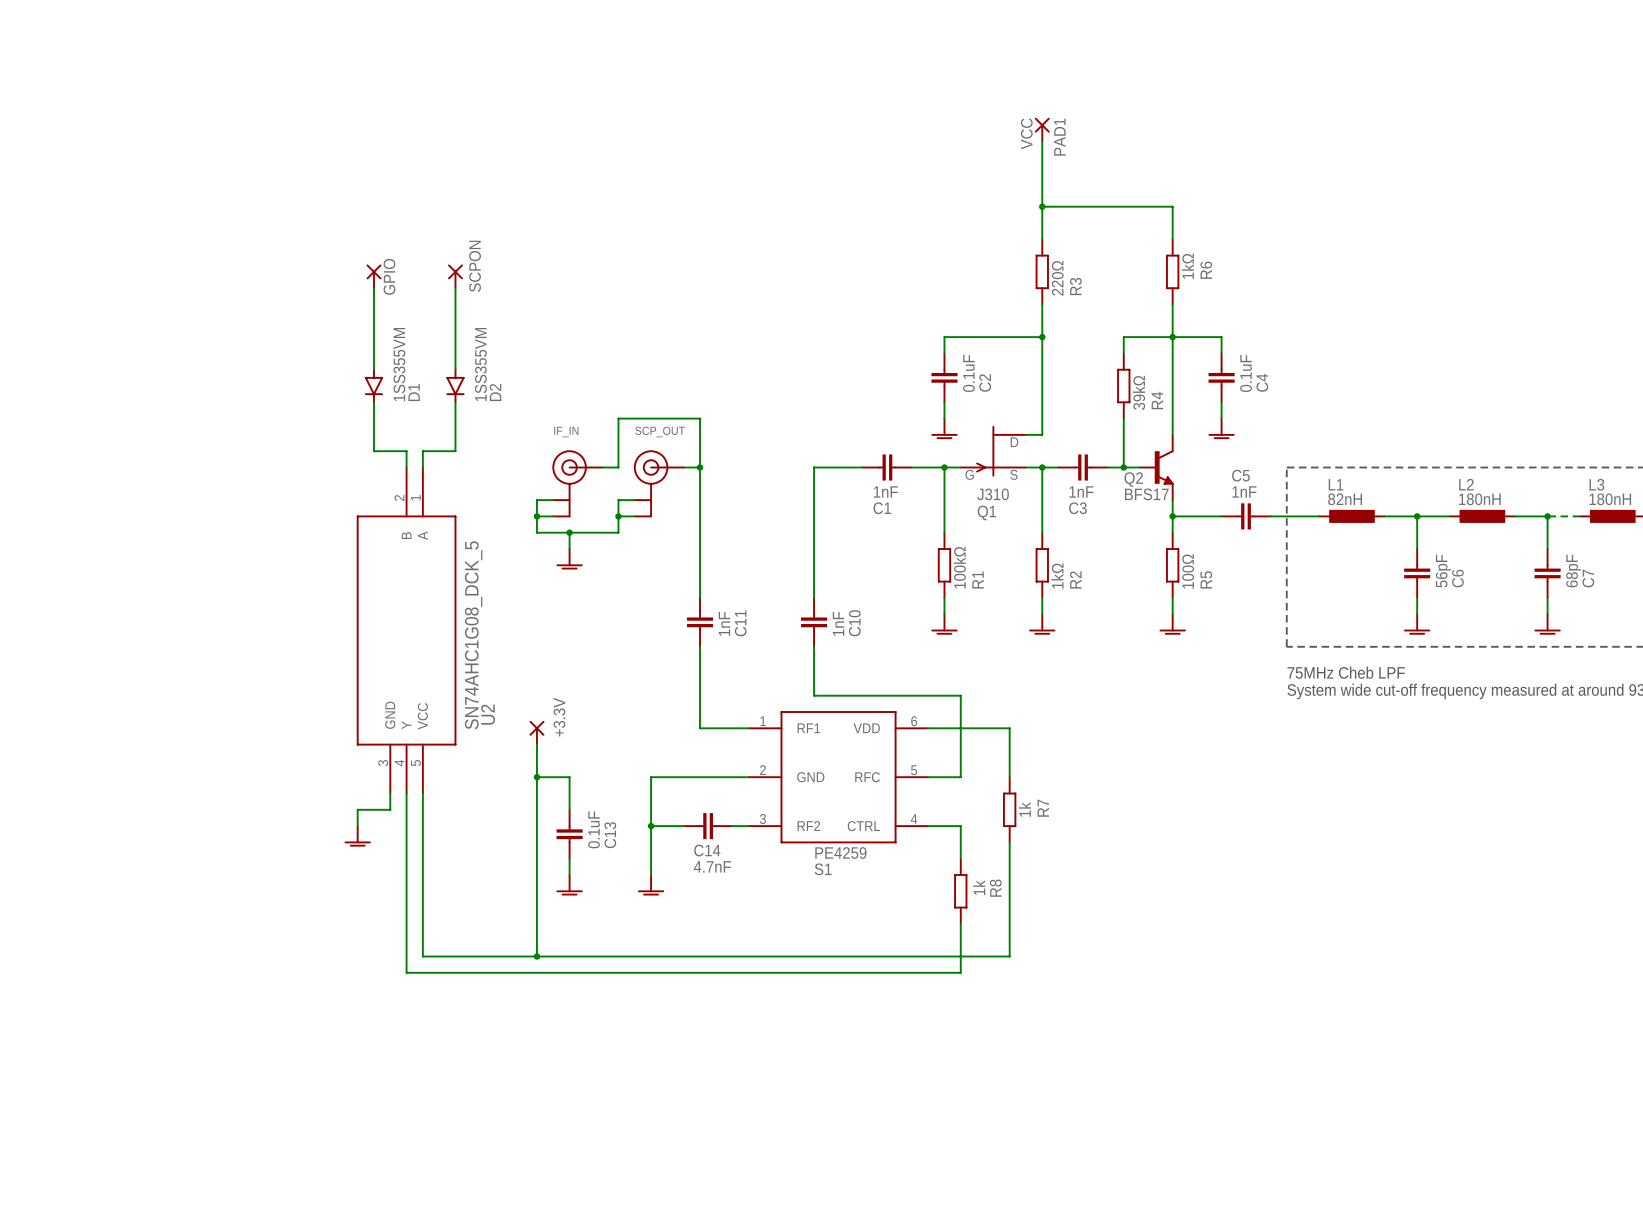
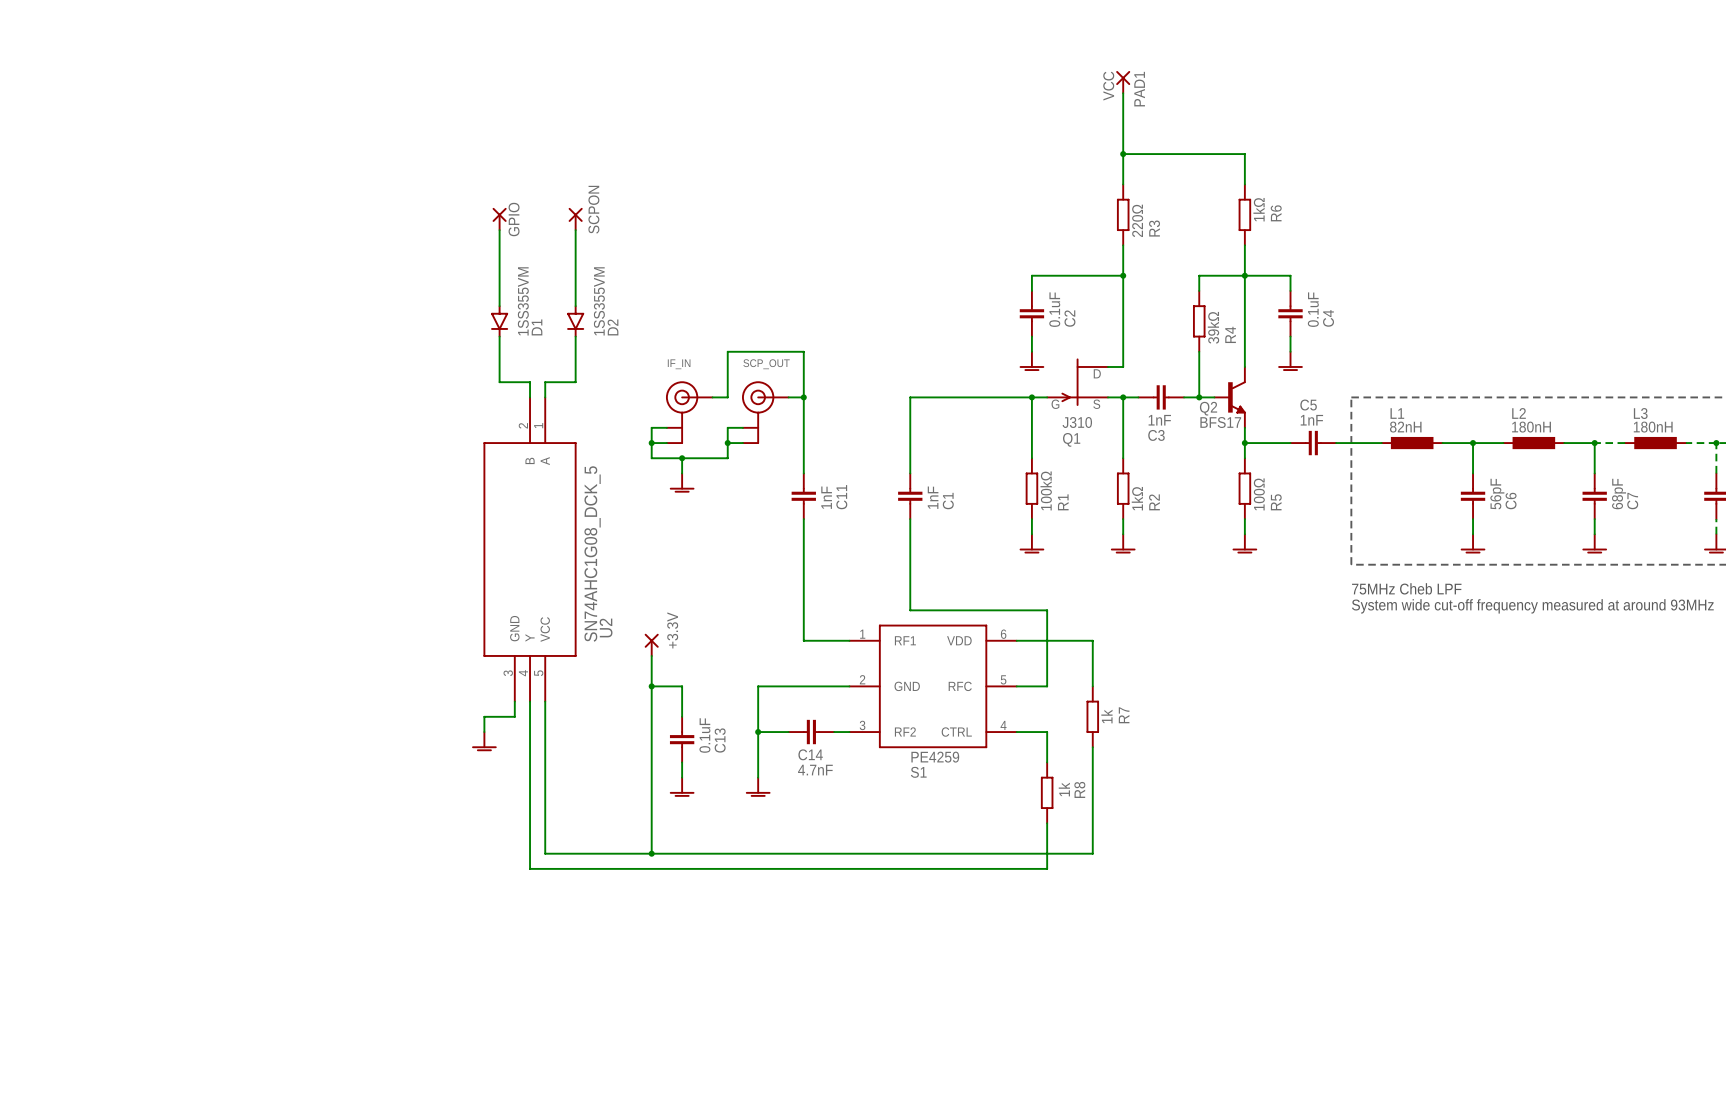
C1 rotation: 0° (887, 467) -> 90° clockwise (910, 496)
C1 position: (887, 467) -> (910, 496)
C1 value position: 1nF (885, 491) -> 1nF (933, 497)
C1 name position: C1 (882, 508) -> C1 (948, 501)
C11 position: (699, 622) -> (803, 496)
C10: 1nF (814, 622) -> none

